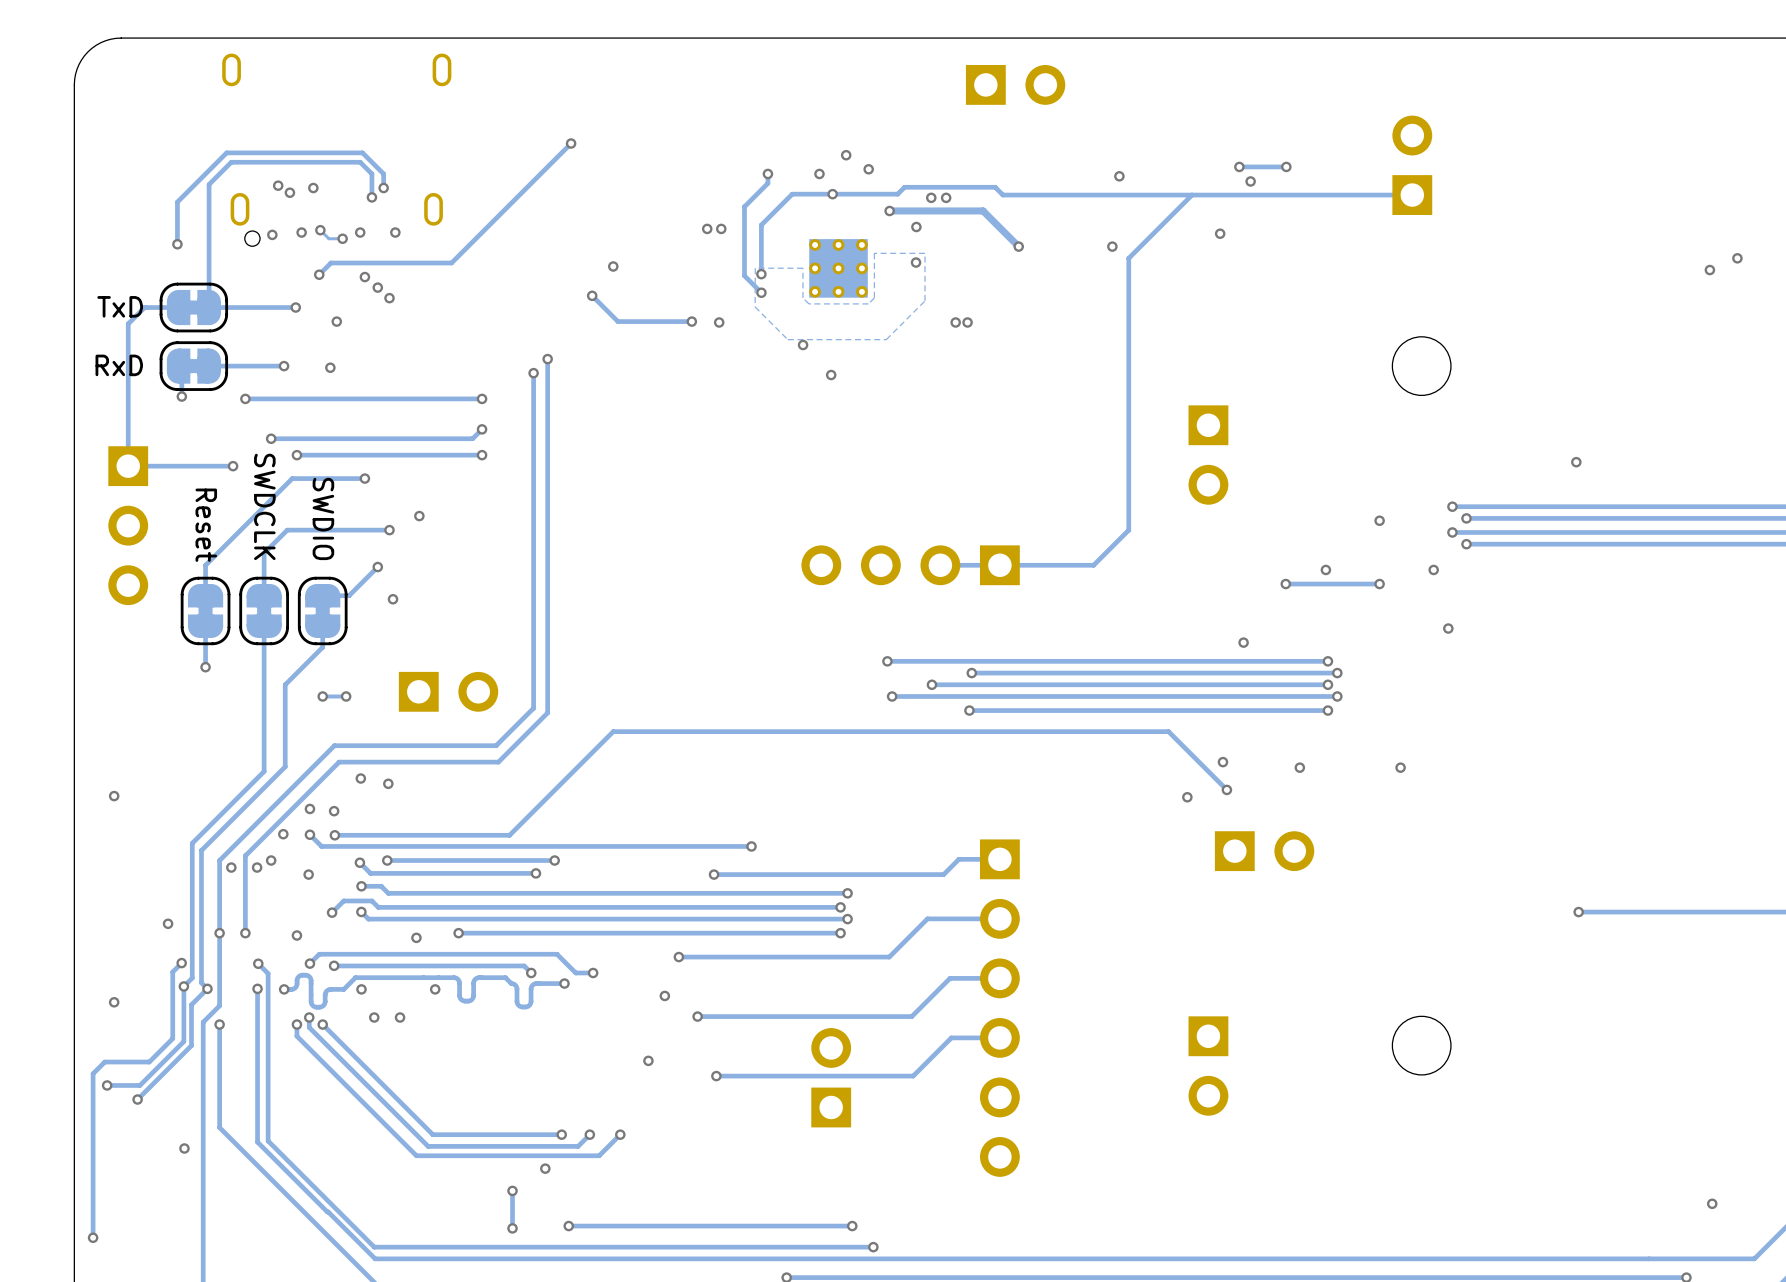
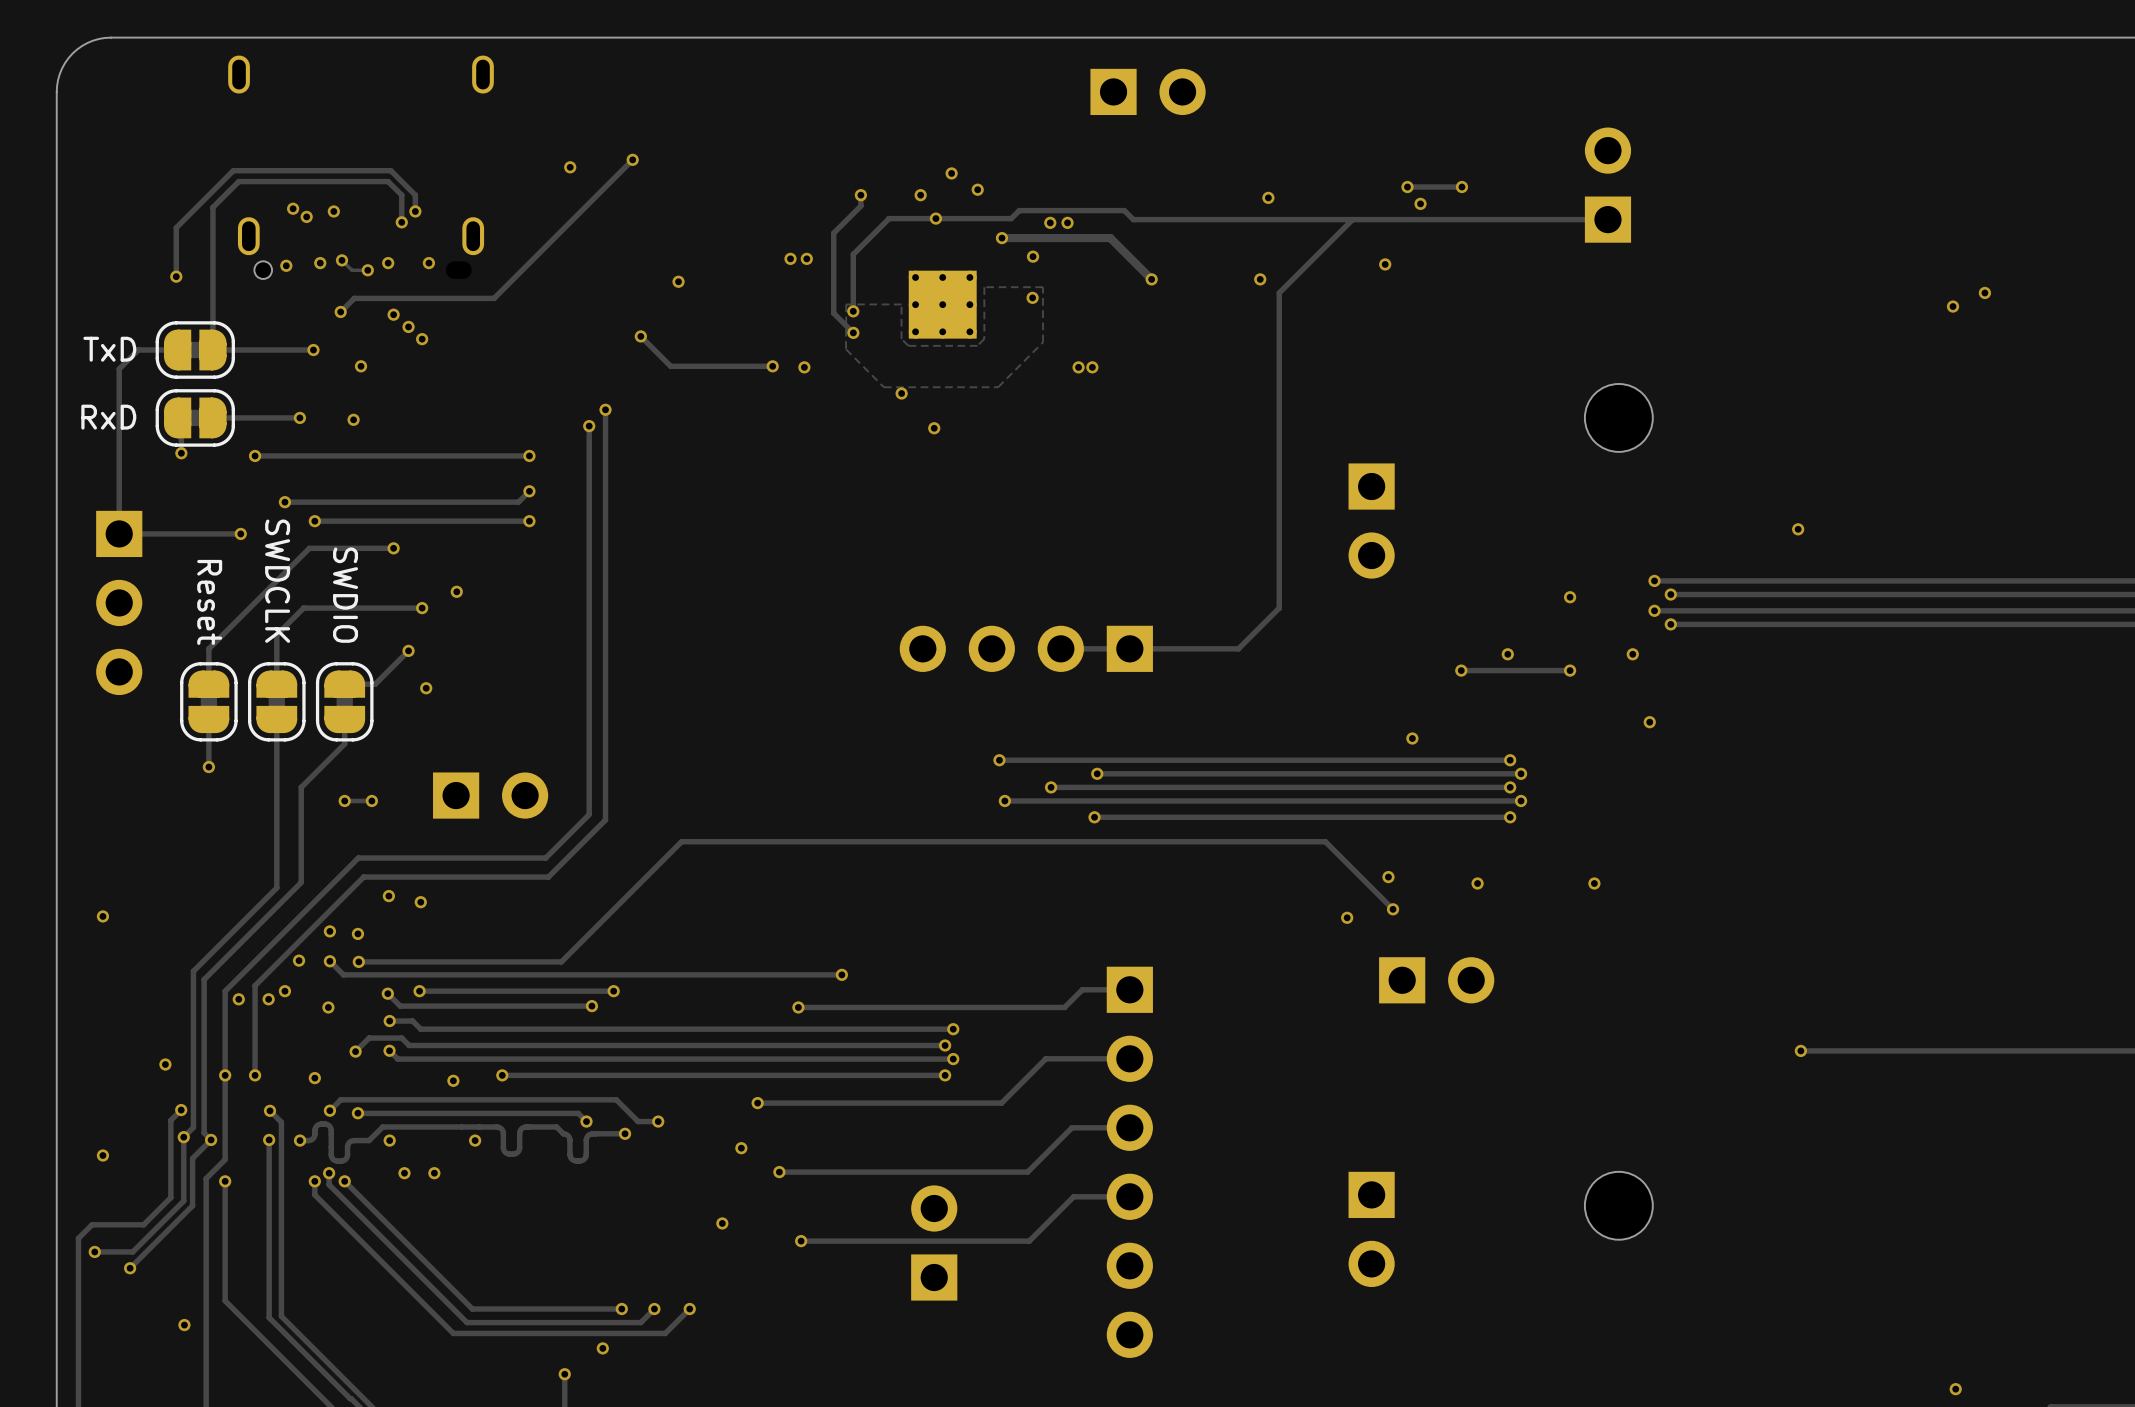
via: none -> (570, 167)
via position: (613, 266) -> (678, 281)
track: (592, 295) (617, 321) -> (640, 336) (670, 366) (687, 366)
via position: (592, 295) -> (640, 336)

